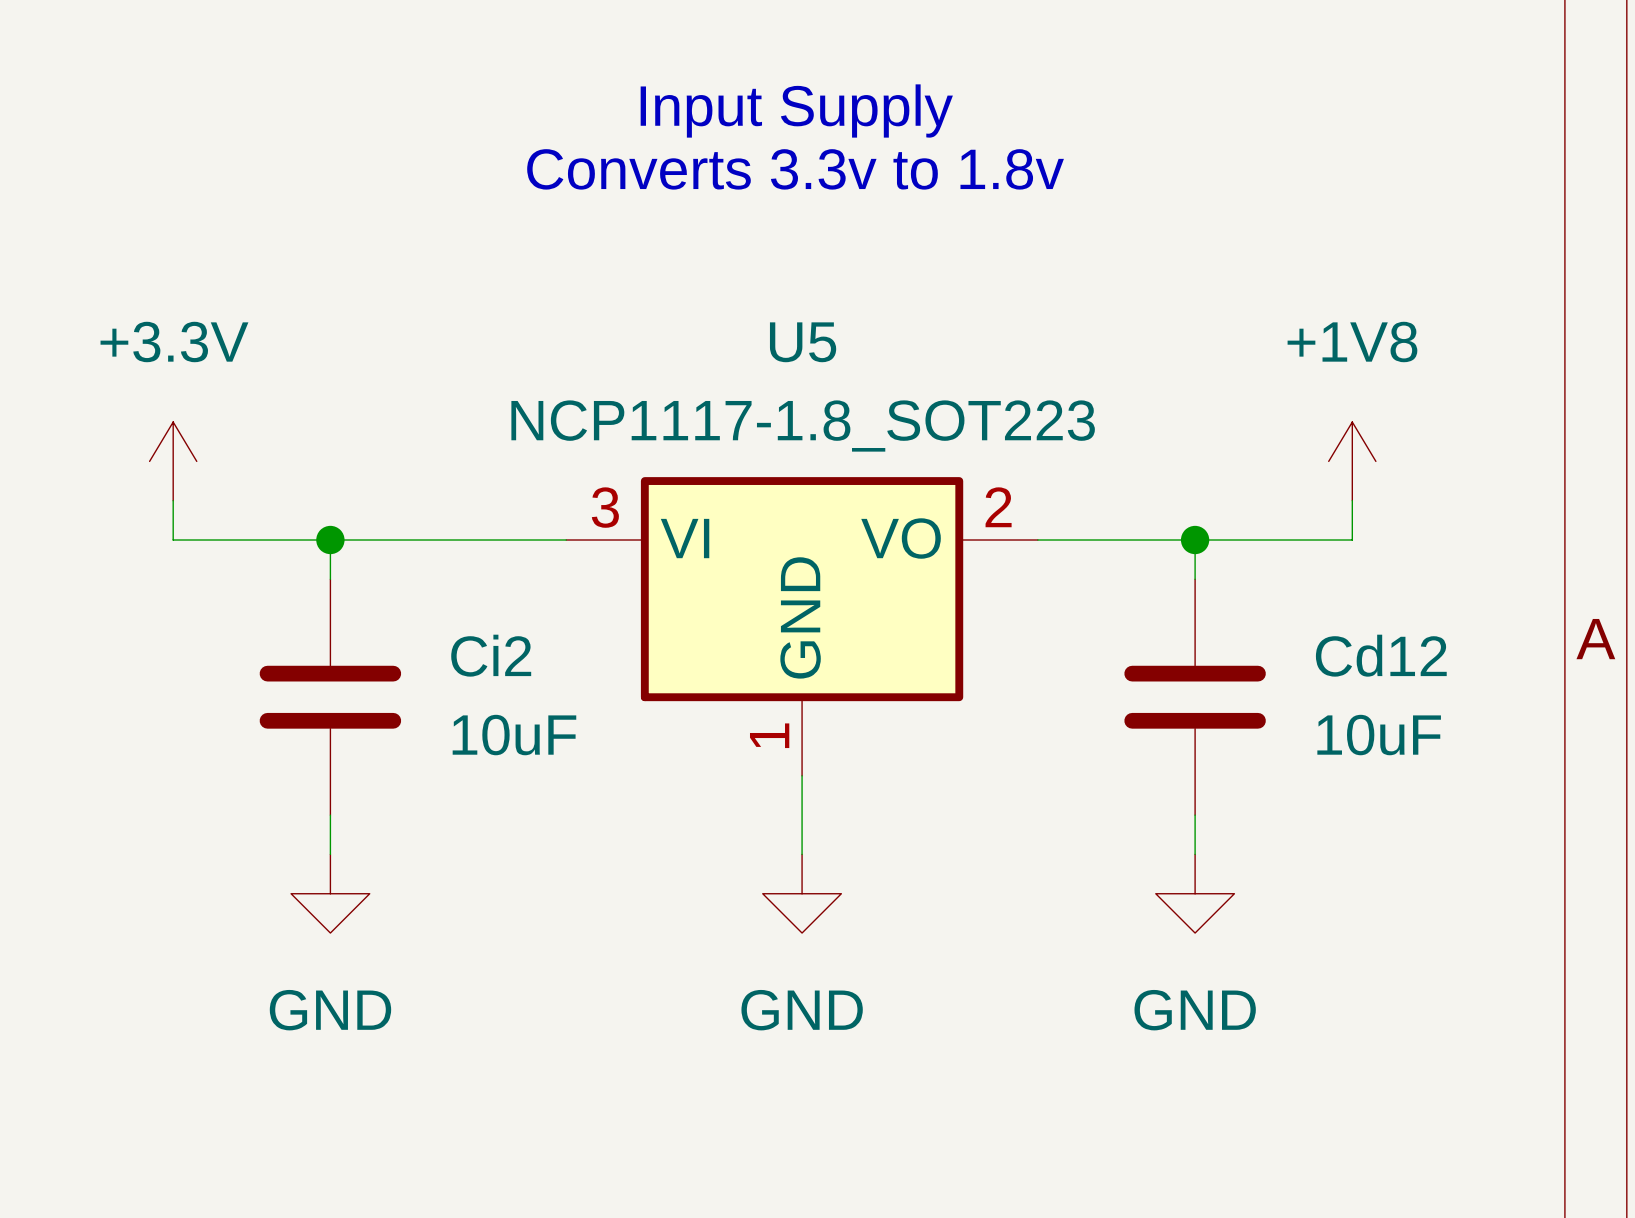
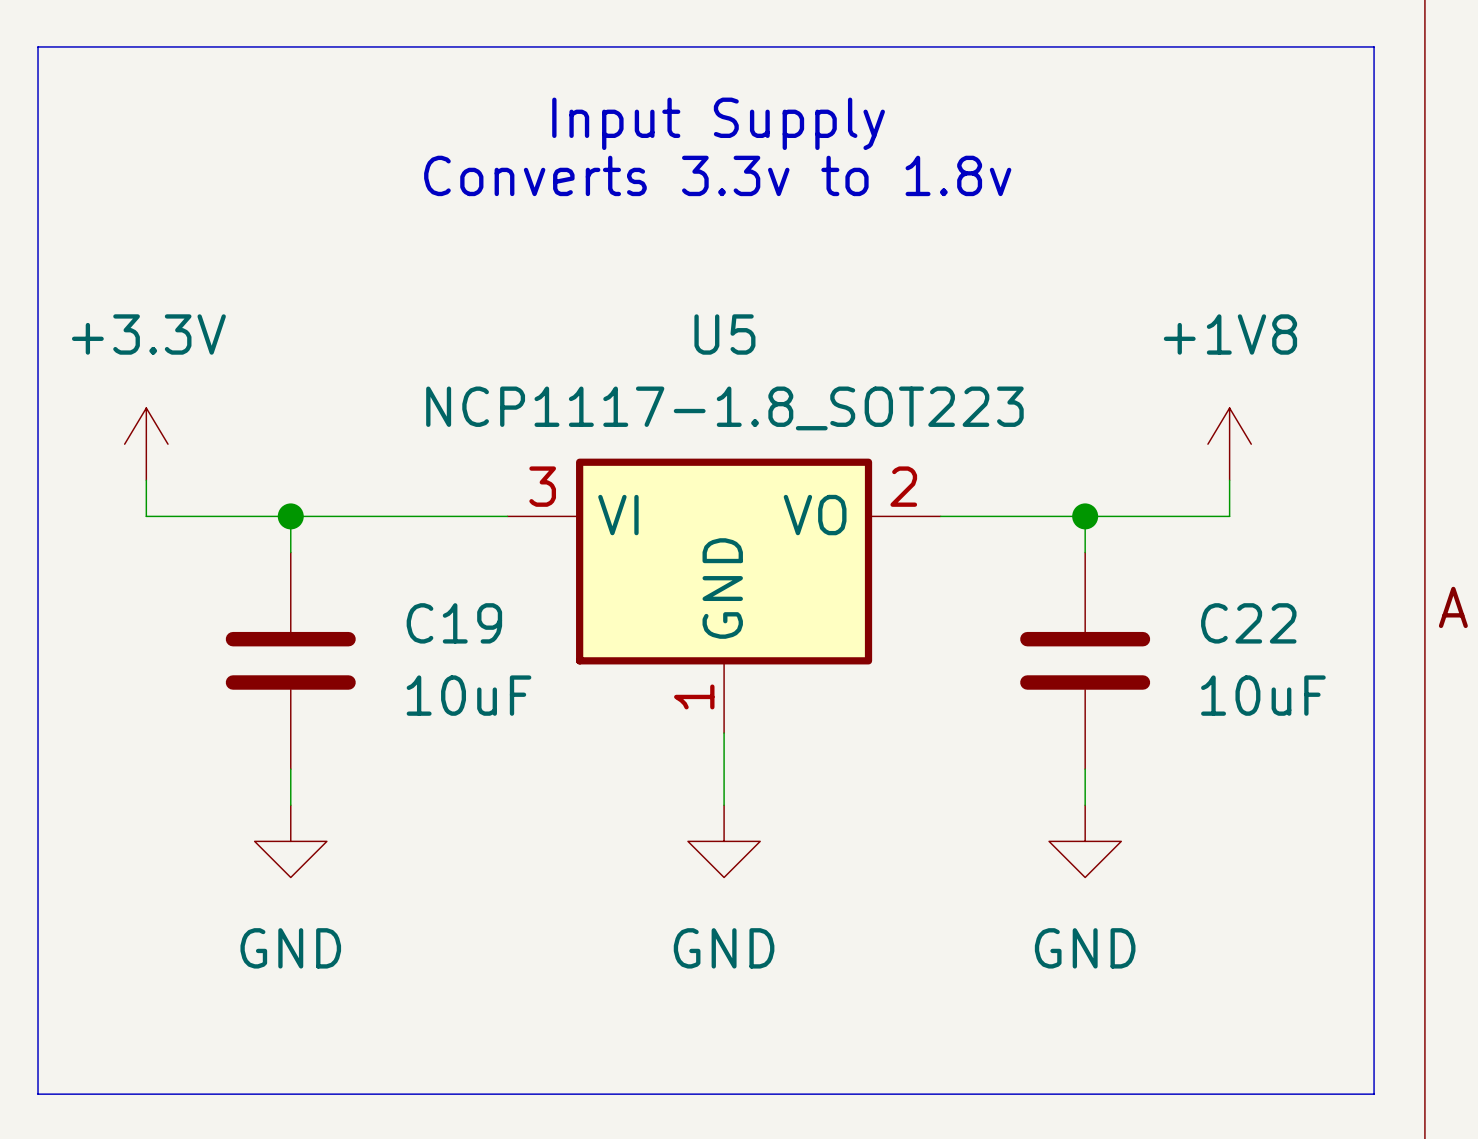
line: none -> (38, 46) (1374, 46) (1374, 1094) (38, 1094) (38, 46)
Ci2 name: Ci2 (491, 655) -> C19 (454, 623)
Cd12 name: Cd12 (1381, 655) -> C22 (1248, 623)

